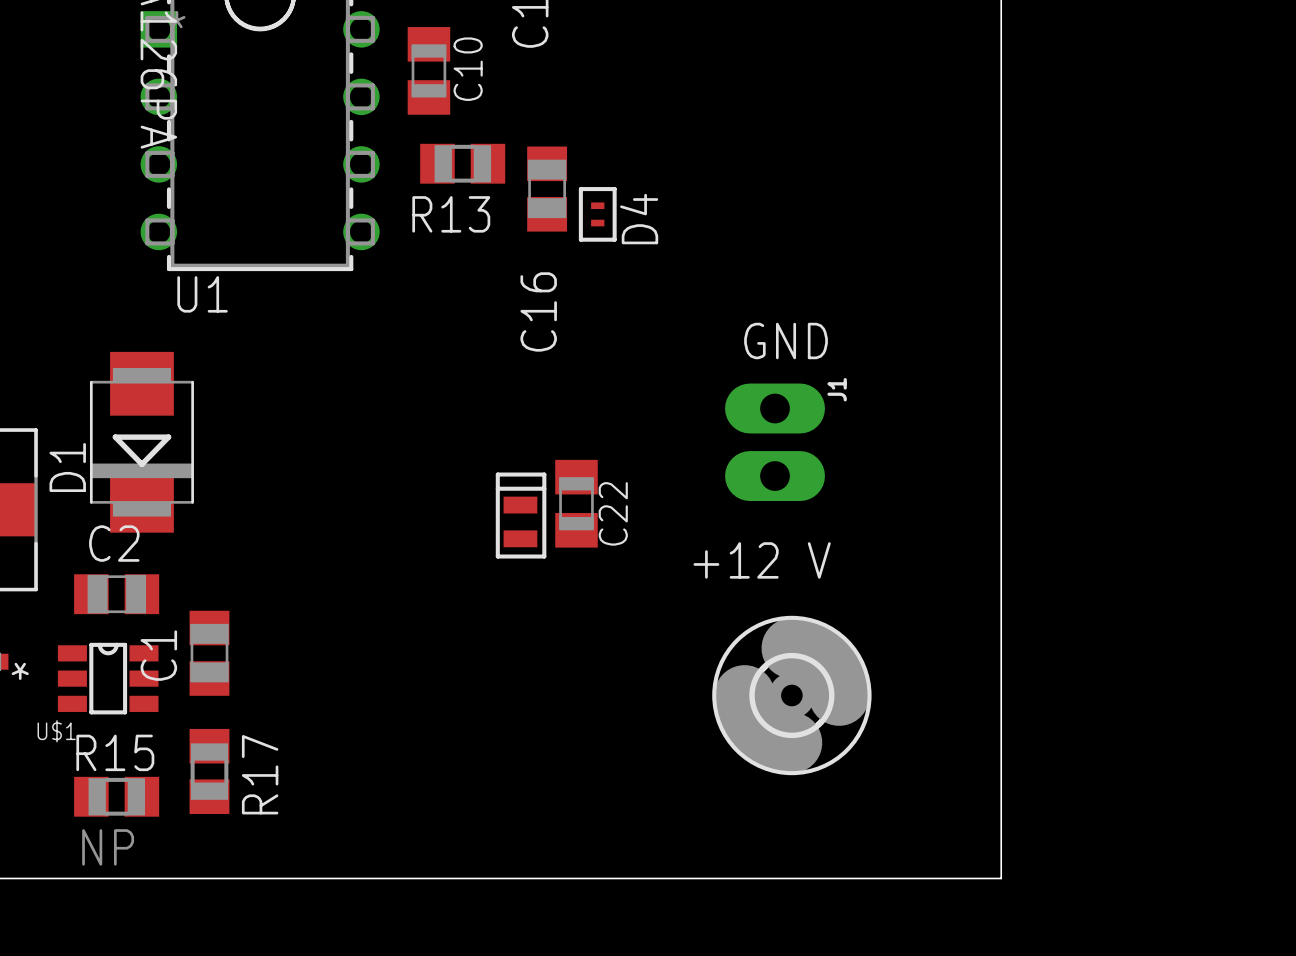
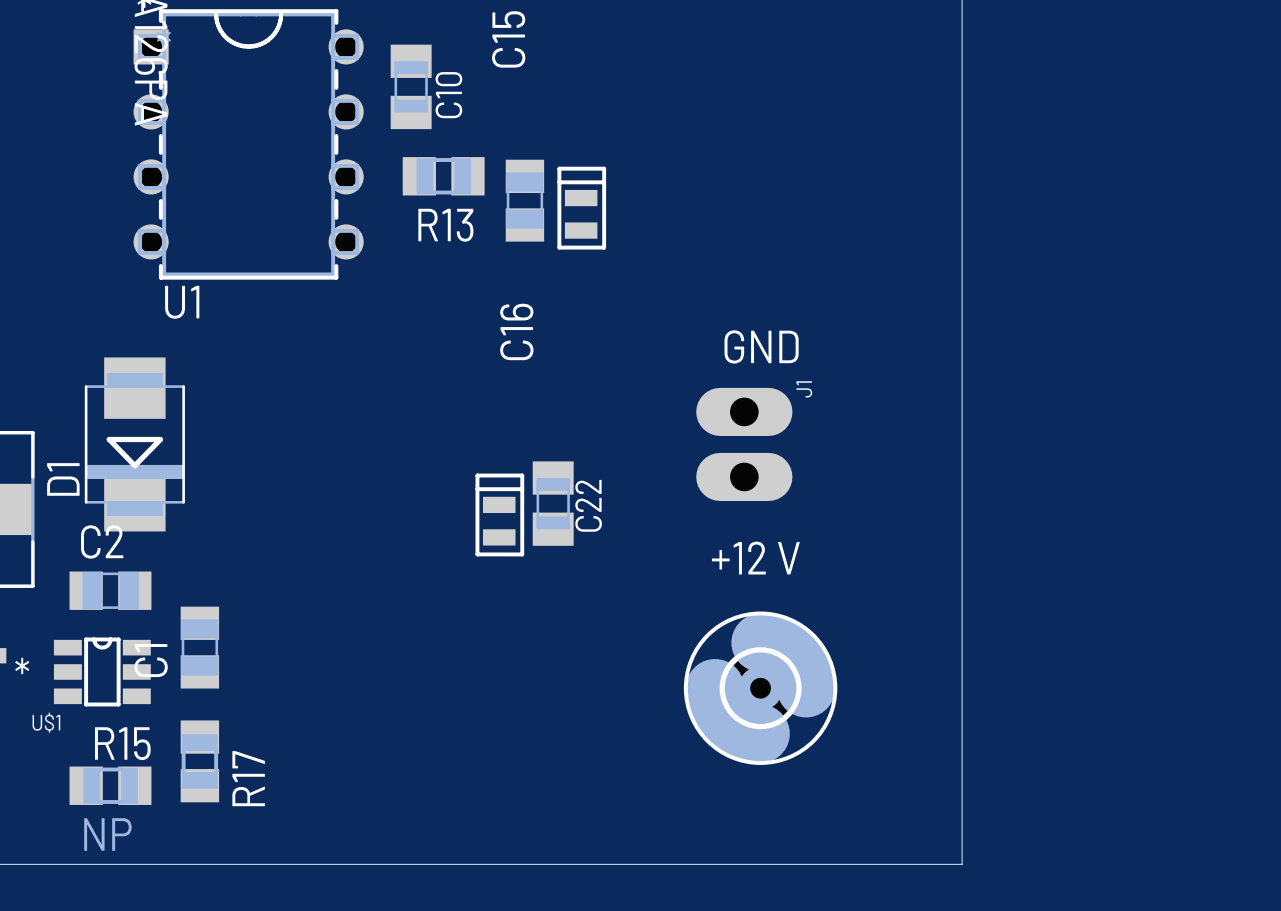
line: (580, 189) (580, 239) (614, 239) (614, 189) (580, 189) -> none
part footprint: [591, 202, 605, 227] -> [557, 166, 607, 250]
text: D4 (639, 219) -> none

